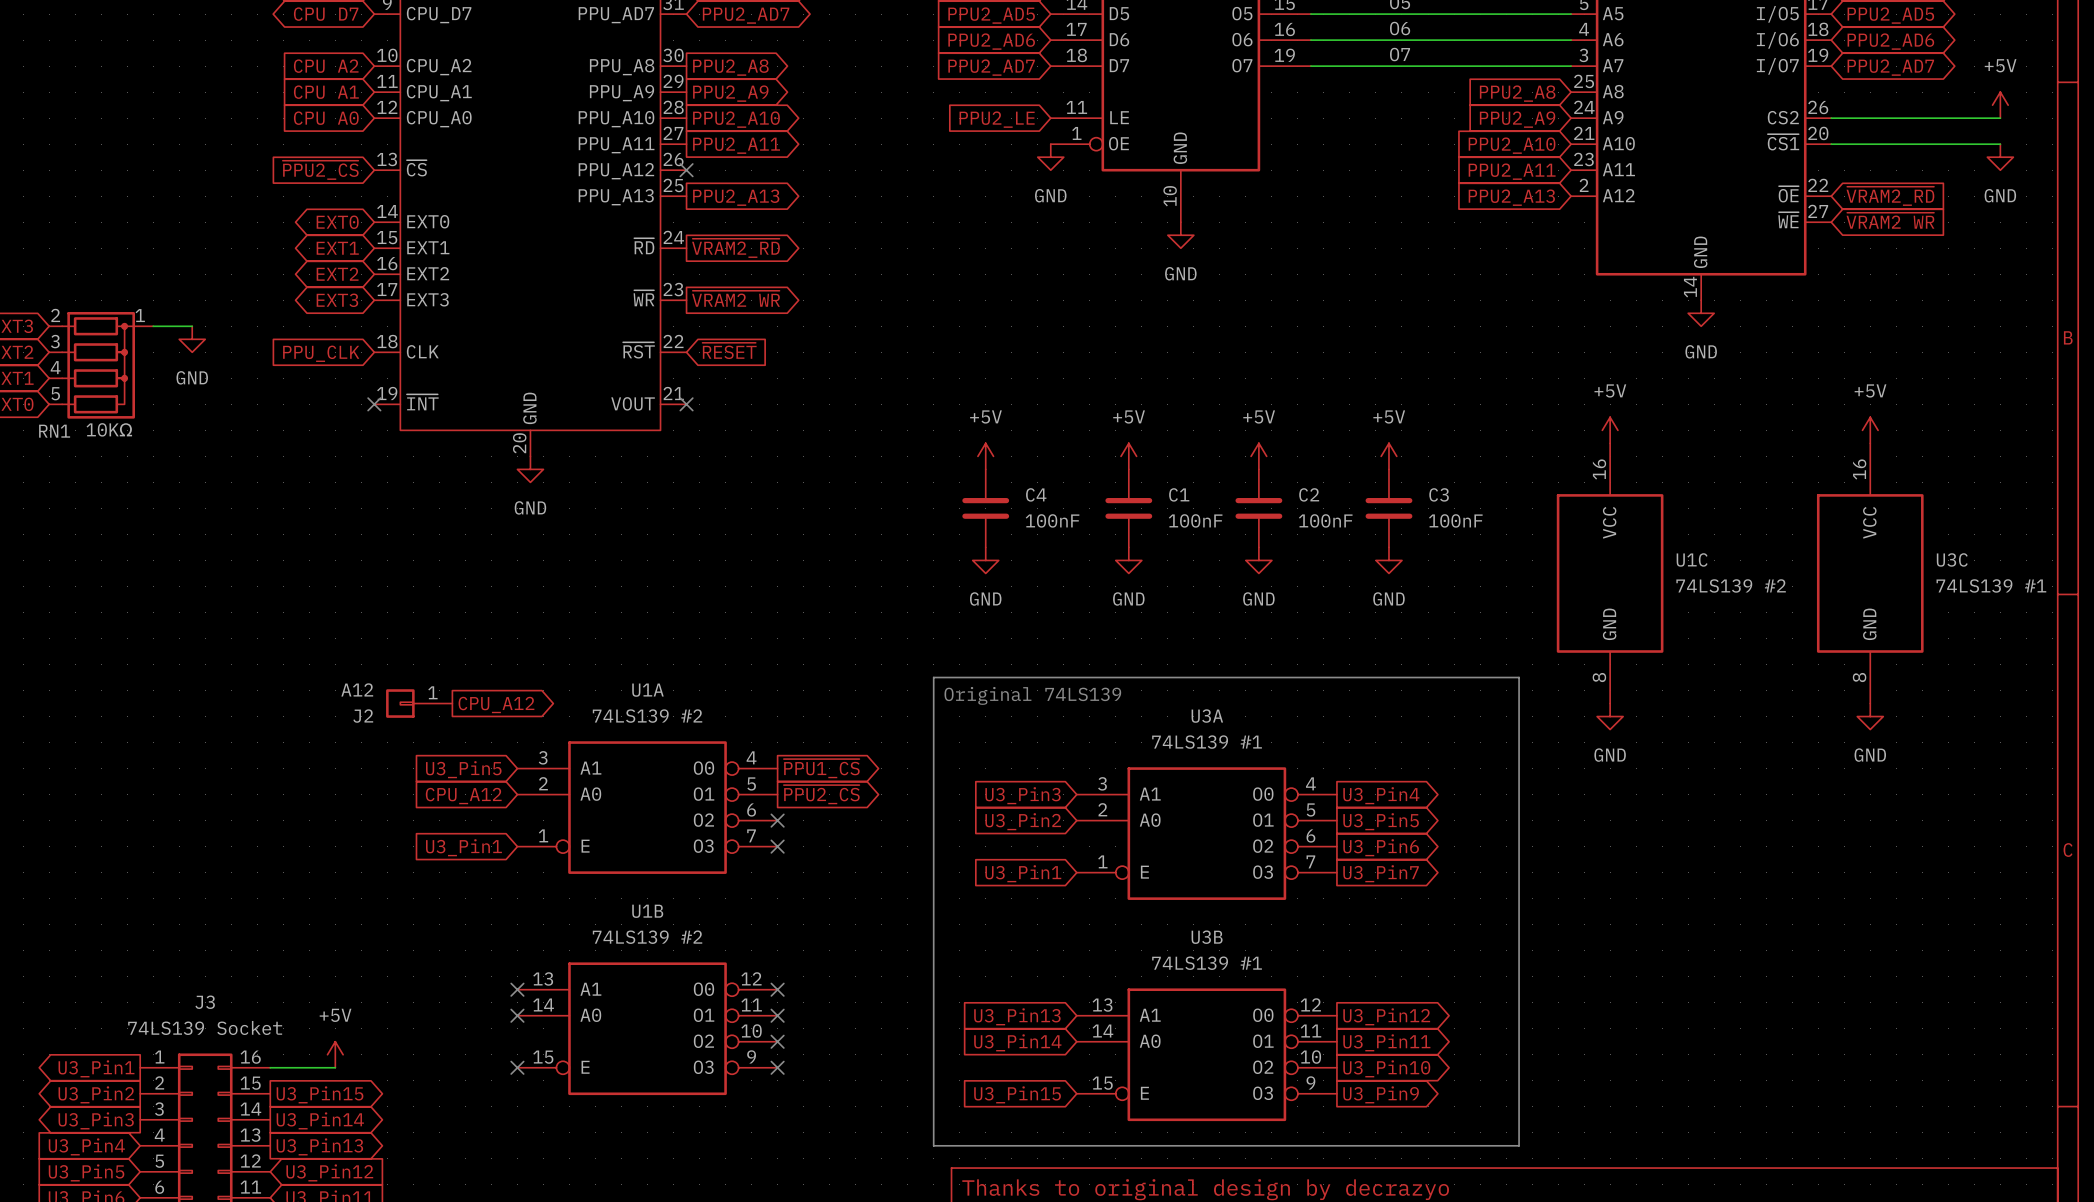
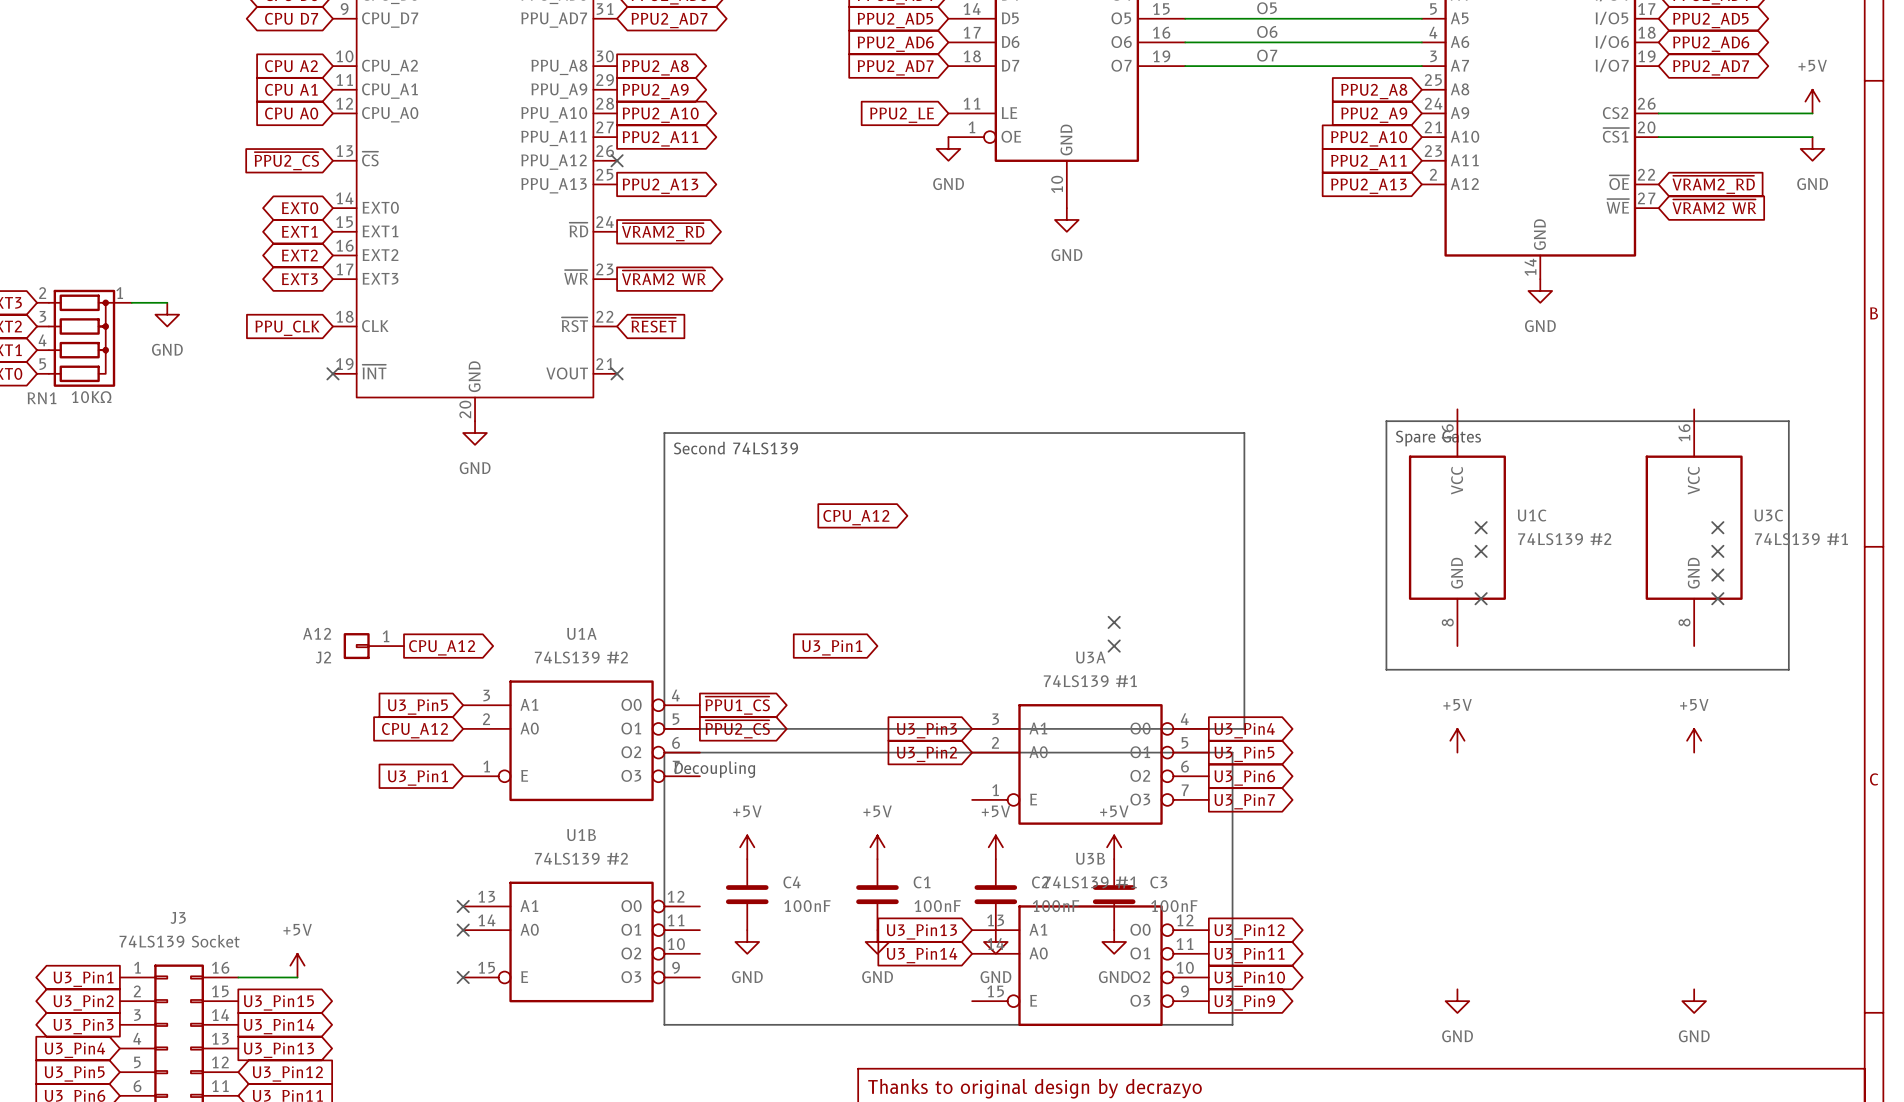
power symbol: +5V (1610, 430) -> none
power symbol: +5V (1870, 430) -> none
power symbol: +5V (985, 456) -> none
power symbol: +5V (1128, 456) -> none
power symbol: +5V (1258, 456) -> none
power symbol: +5V (1388, 456) -> none
line: none -> (1386, 421) (1788, 421) (1788, 669) (1386, 669) (1386, 421)
line: none -> (664, 433) (1244, 433) (1244, 728) (664, 728) (664, 433)
text: none -> Spare Gates (1438, 438)
text: none -> Second 74LS139 (735, 448)
C4 position: (985, 508) -> (747, 894)
C1 position: (1128, 508) -> (877, 894)
C2 position: (1258, 508) -> (995, 894)
C3 position: (1388, 508) -> (1114, 894)
power symbol: GND (985, 560) -> none
power symbol: GND (1128, 560) -> none
power symbol: GND (1258, 560) -> none
power symbol: GND (1388, 560) -> none
global label: none -> CPU_A12 (856, 517)
no-connect mark: none -> (1481, 527)
no-connect mark: none -> (1717, 527)
no-connect mark: none -> (1481, 551)
no-connect mark: none -> (1717, 551)
no-connect mark: none -> (1717, 575)
no-connect mark: none -> (1481, 598)
no-connect mark: none -> (1717, 598)
line: (933, 677) (1519, 677) (1519, 1145) (933, 1145) (933, 677) -> none
no-connect mark: none -> (1114, 622)
text: Original 74LS139 (1032, 695) -> none
no-connect mark: none -> (1114, 646)
power symbol: GND (1610, 716) -> none
power symbol: GND (1870, 716) -> none
power symbol: none -> +5V (1457, 740)
power symbol: none -> +5V (1694, 740)
line: none -> (664, 752) (664, 1024) (1232, 1024) (1232, 752) (664, 752)
no-connect mark: (777, 820) -> none
text: none -> Decoupling (714, 769)
no-connect mark: (777, 846) -> none
global label position: U3_Pin1 (1023, 873) -> U3_Pin1 (832, 647)
power symbol: none -> +5V (747, 847)
power symbol: none -> +5V (877, 847)
power symbol: none -> +5V (995, 847)
power symbol: none -> +5V (1114, 847)
no-connect mark: (777, 989) -> none
no-connect mark: (777, 1015) -> none
power symbol: none -> GND (747, 941)
power symbol: none -> GND (877, 941)
power symbol: none -> GND (995, 941)
power symbol: none -> GND (1114, 941)
no-connect mark: (777, 1041) -> none
no-connect mark: (777, 1067) -> none
power symbol: none -> GND (1457, 1001)
power symbol: none -> GND (1694, 1001)
global label: U3_Pin15 (1017, 1094) -> none

